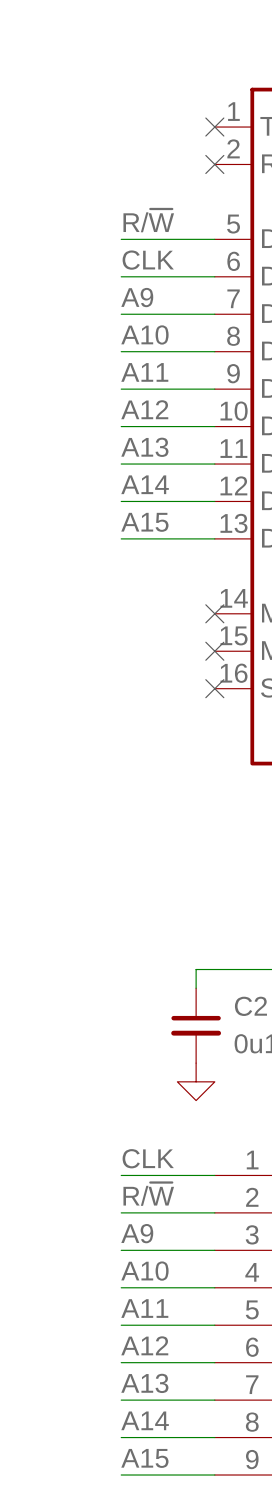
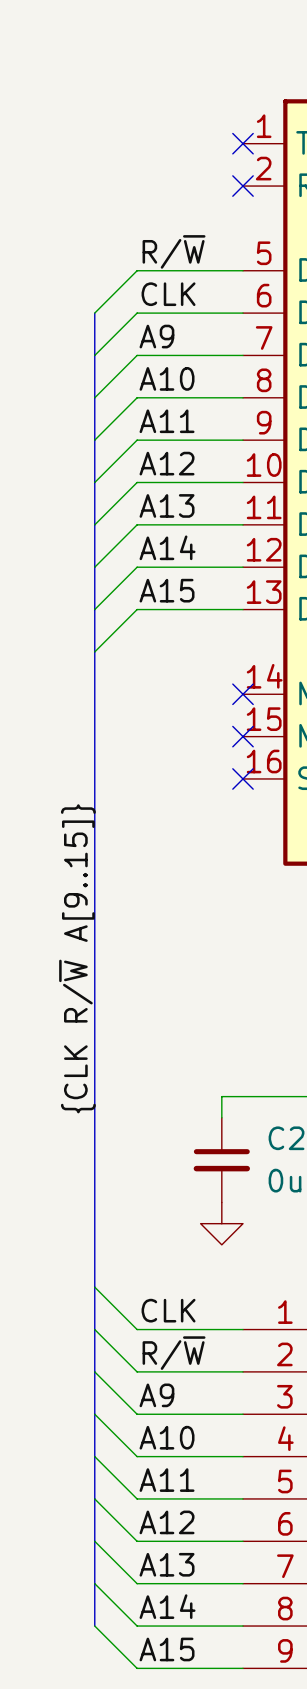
wire: none -> (137, 270) (94, 313)
bus: none -> (94, 313) (94, 1626)
wire: none -> (137, 313) (94, 355)
wire: none -> (137, 355) (94, 397)
wire: none -> (137, 397) (94, 440)
wire: none -> (137, 440) (94, 482)
wire: none -> (137, 482) (94, 524)
wire: none -> (137, 524) (94, 567)
wire: none -> (137, 567) (94, 609)
wire: none -> (137, 609) (94, 651)
label: none -> {CLK R/~{W} A[9..15]} (77, 958)
wire: none -> (94, 1287) (137, 1329)
wire: none -> (94, 1329) (137, 1371)
wire: none -> (94, 1371) (137, 1414)
wire: none -> (94, 1414) (137, 1456)
wire: none -> (94, 1456) (137, 1498)
wire: none -> (94, 1498) (137, 1541)
wire: none -> (94, 1541) (137, 1583)
wire: none -> (94, 1583) (137, 1626)
wire: none -> (94, 1626) (137, 1668)

